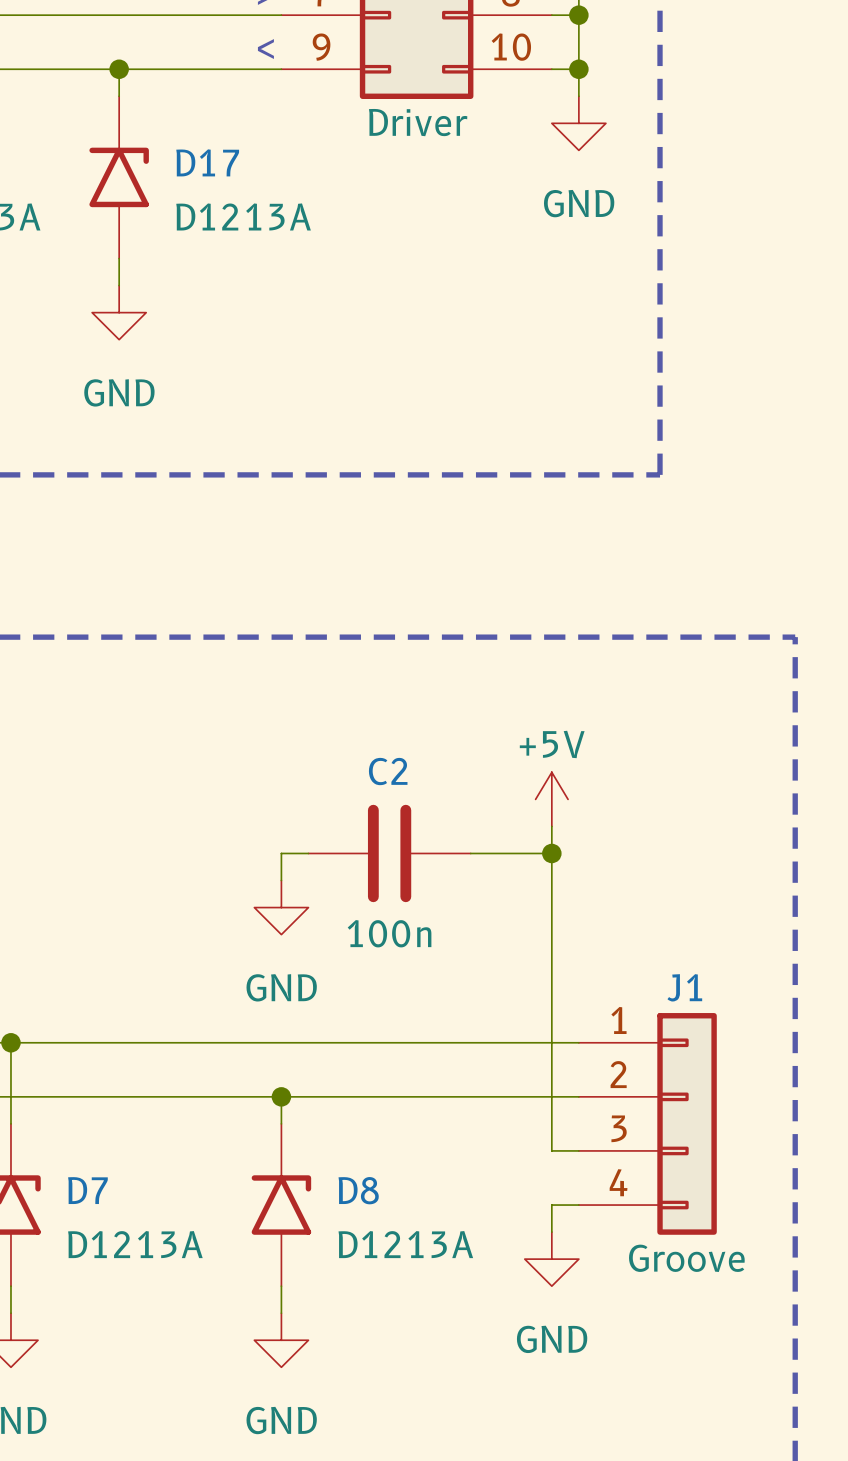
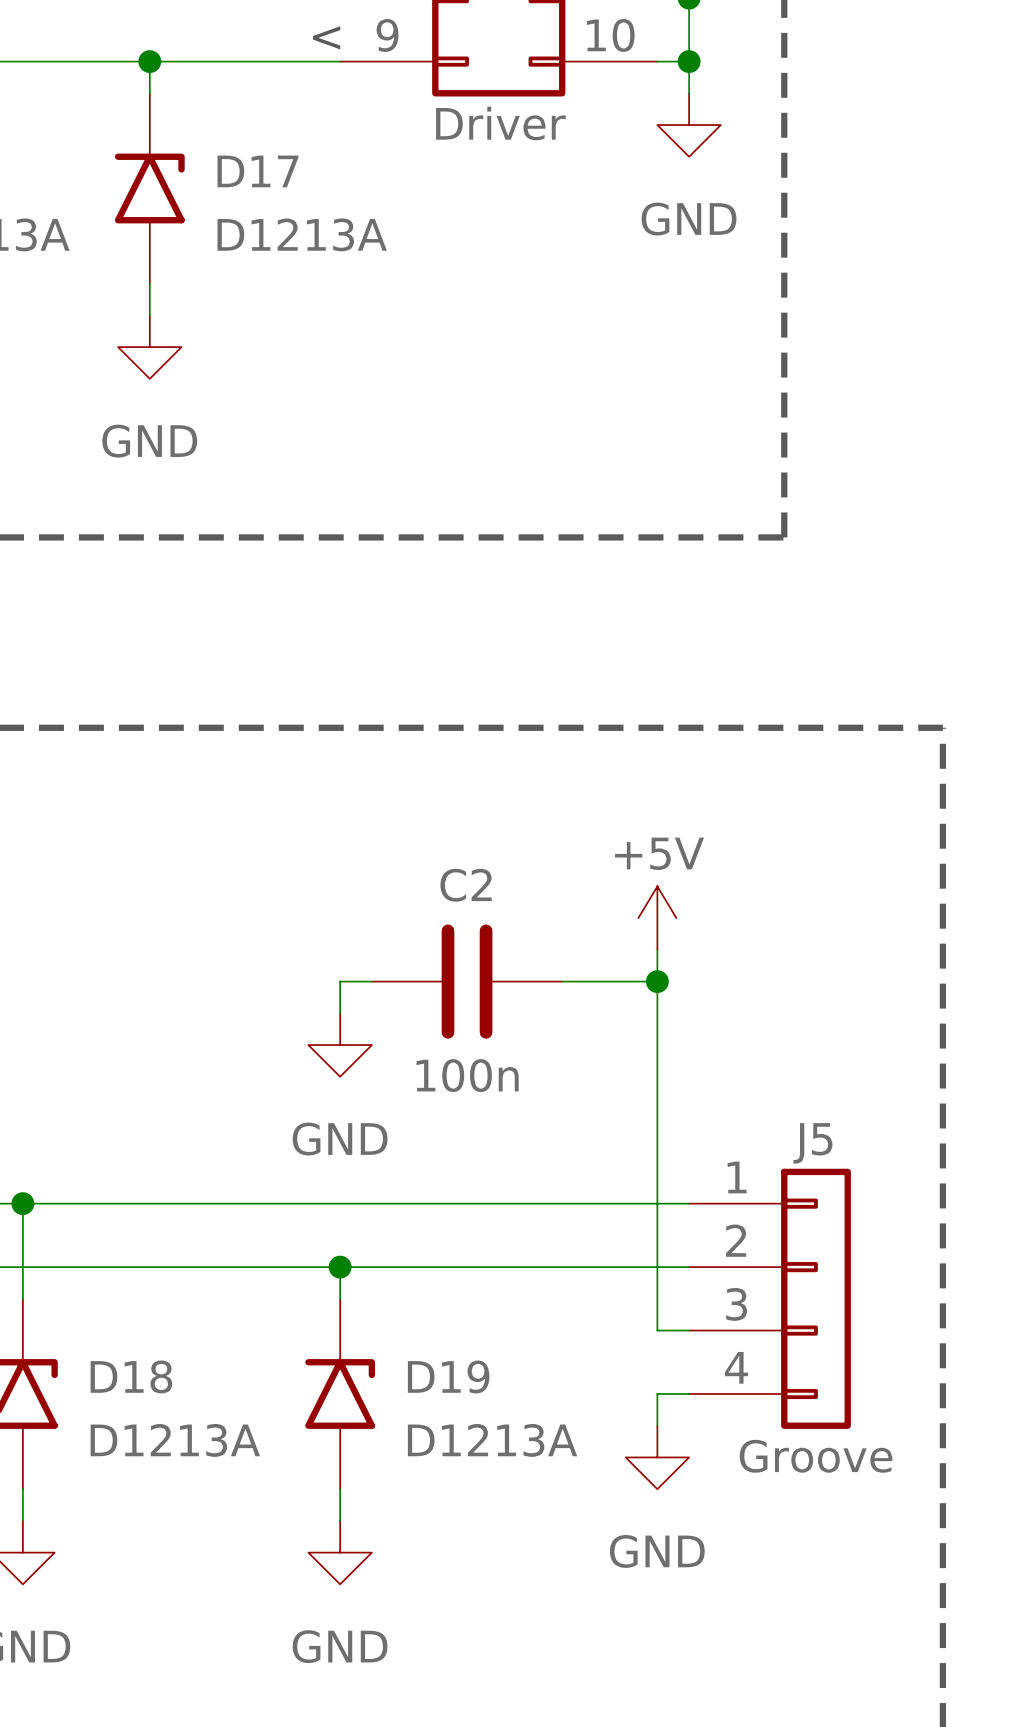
J1 name: J1 (684, 987) -> J5 (812, 1143)
D7 name: D7 (87, 1190) -> D18 (131, 1376)
D8 name: D8 (358, 1190) -> D19 (448, 1376)

